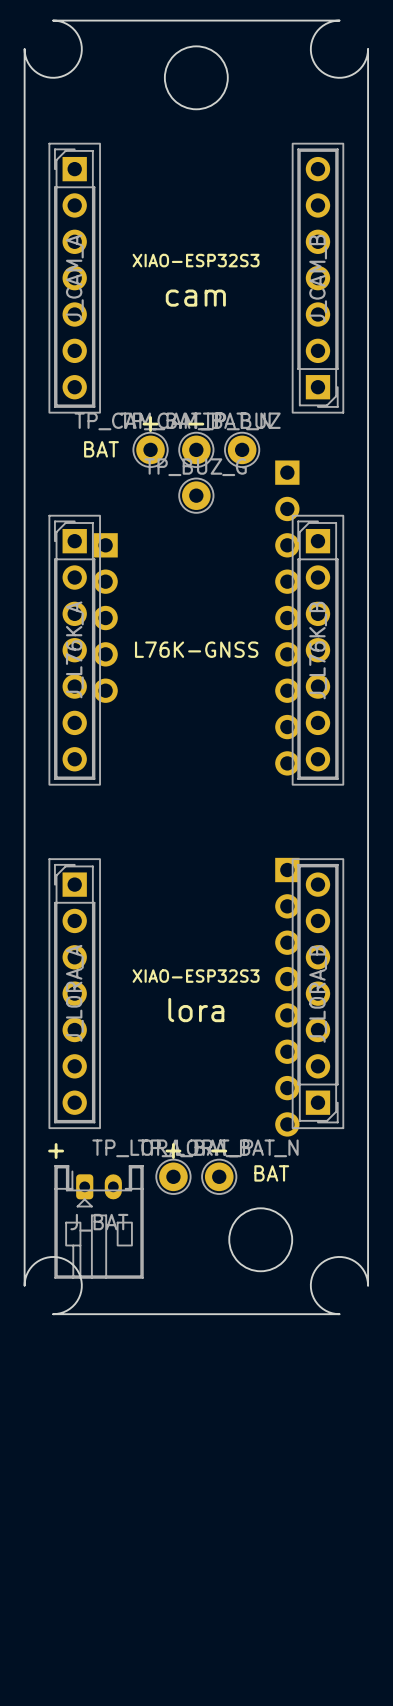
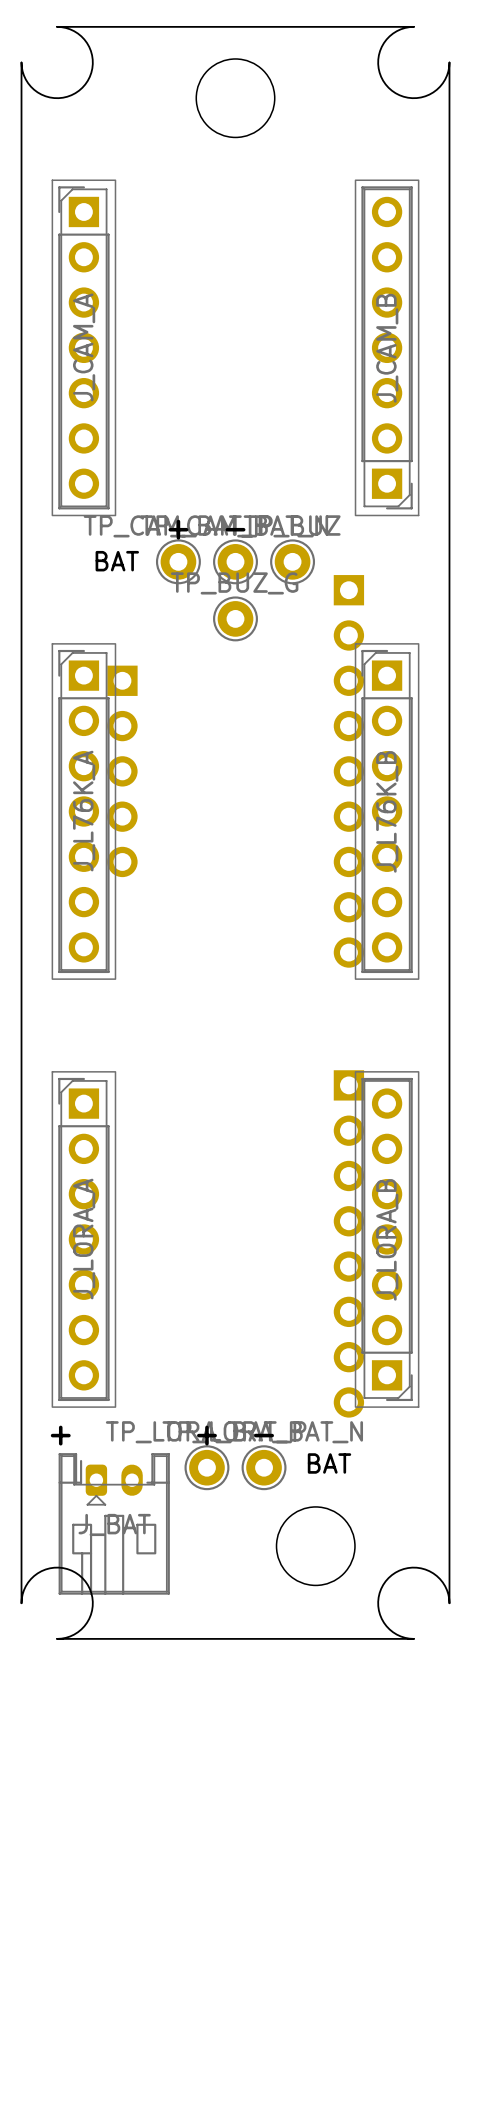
text: XIAO-ESP32S3 (196, 260) -> none
text: cam (195, 298) -> none
text: L76K-GNSS (196, 649) -> none
text: XIAO-ESP32S3 (196, 976) -> none
text: lora (196, 1010) -> none

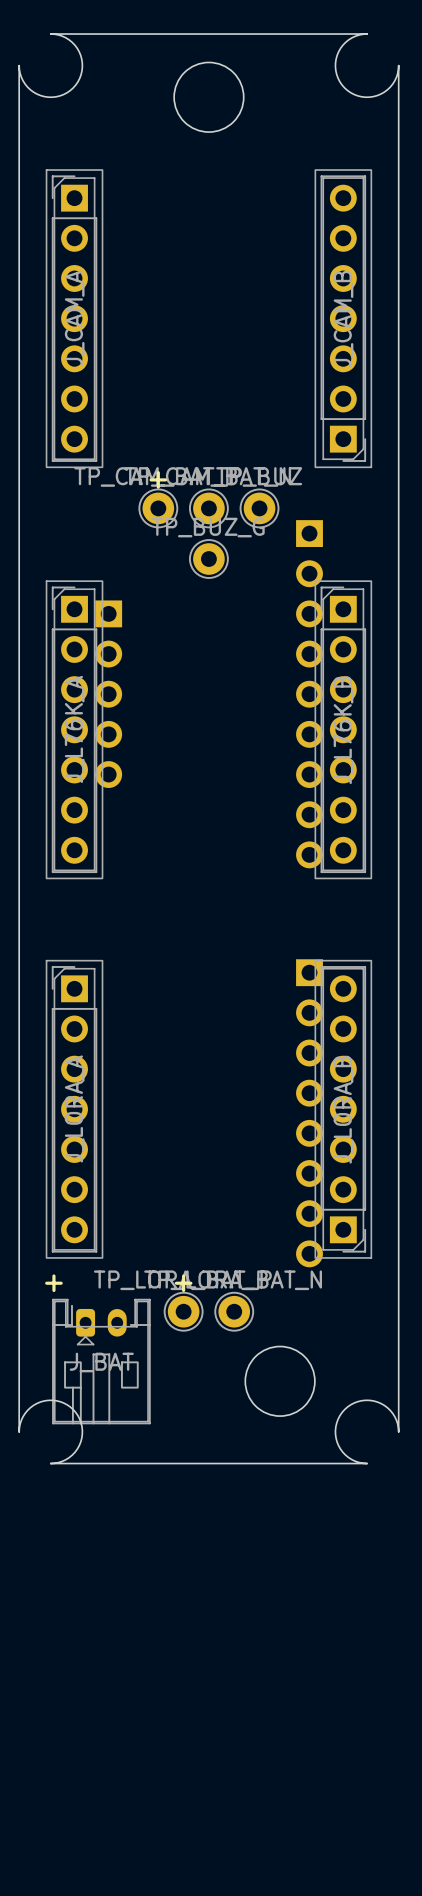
text: - (235, 529) -> none
text: BAT (117, 561) -> none
text: - (264, 1435) -> none
text: BAT (329, 1463) -> none

